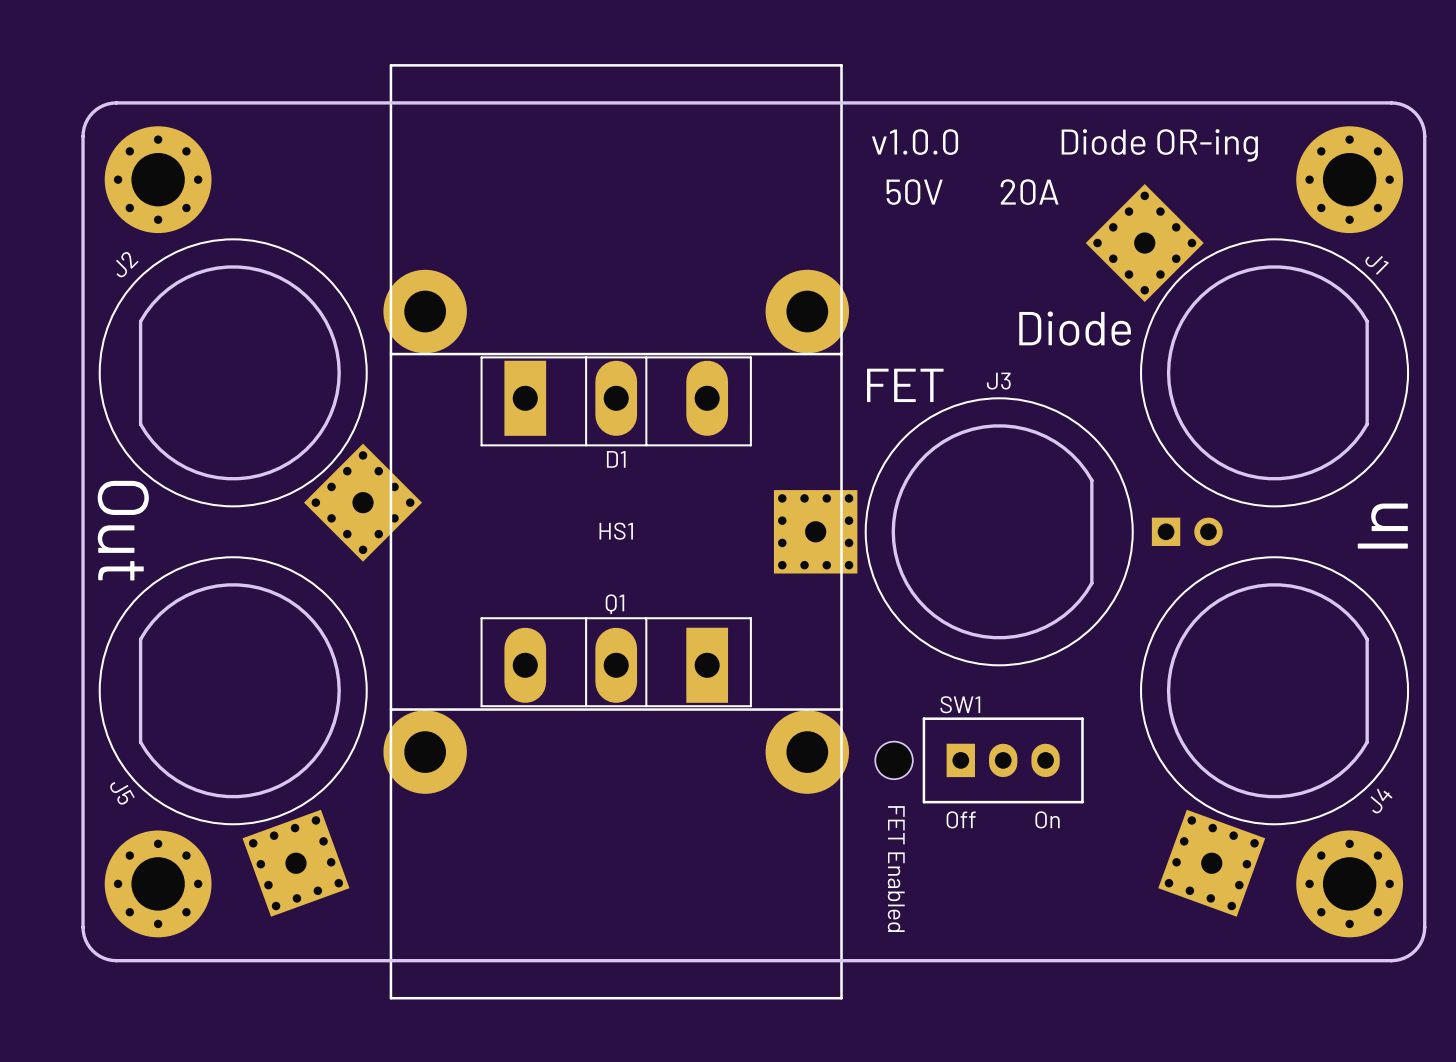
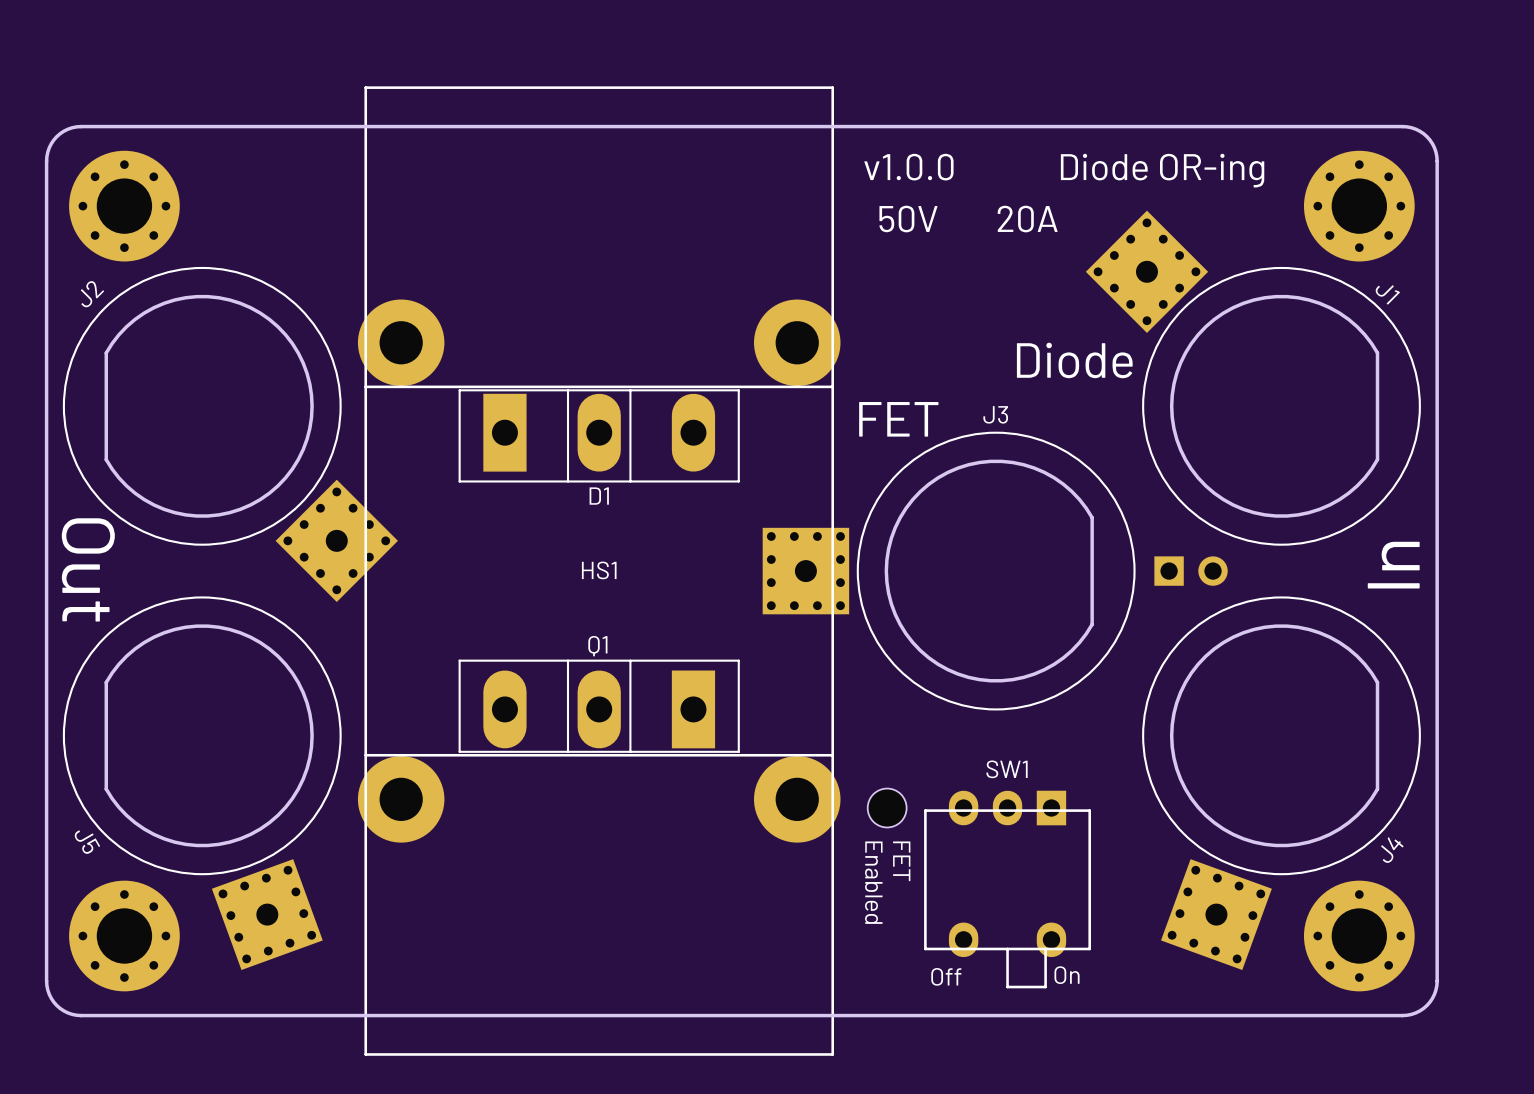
SW1 name position: SW1 (960, 704) -> SW1 (1007, 769)
SW1 footprint: [922, 717, 1084, 804] -> [924, 790, 1091, 989]
text: none -> FET (901, 861)
text position: Off (961, 819) -> Off (946, 976)
text position: On (1047, 819) -> On (1067, 975)
text: FET Enabled (896, 869) -> Enabled (873, 882)

